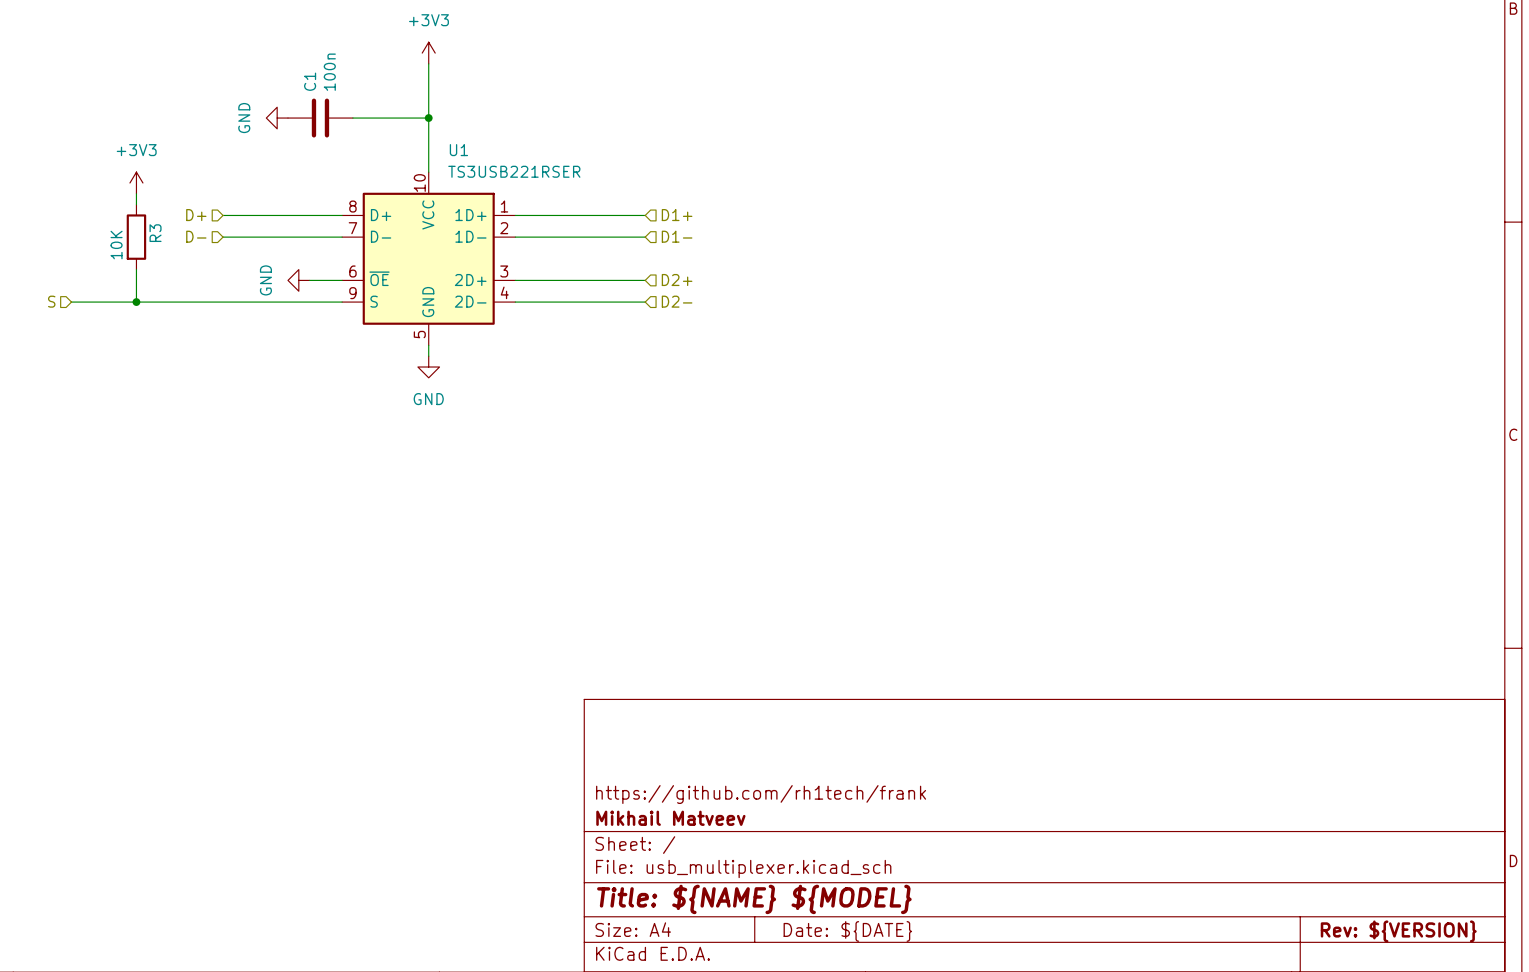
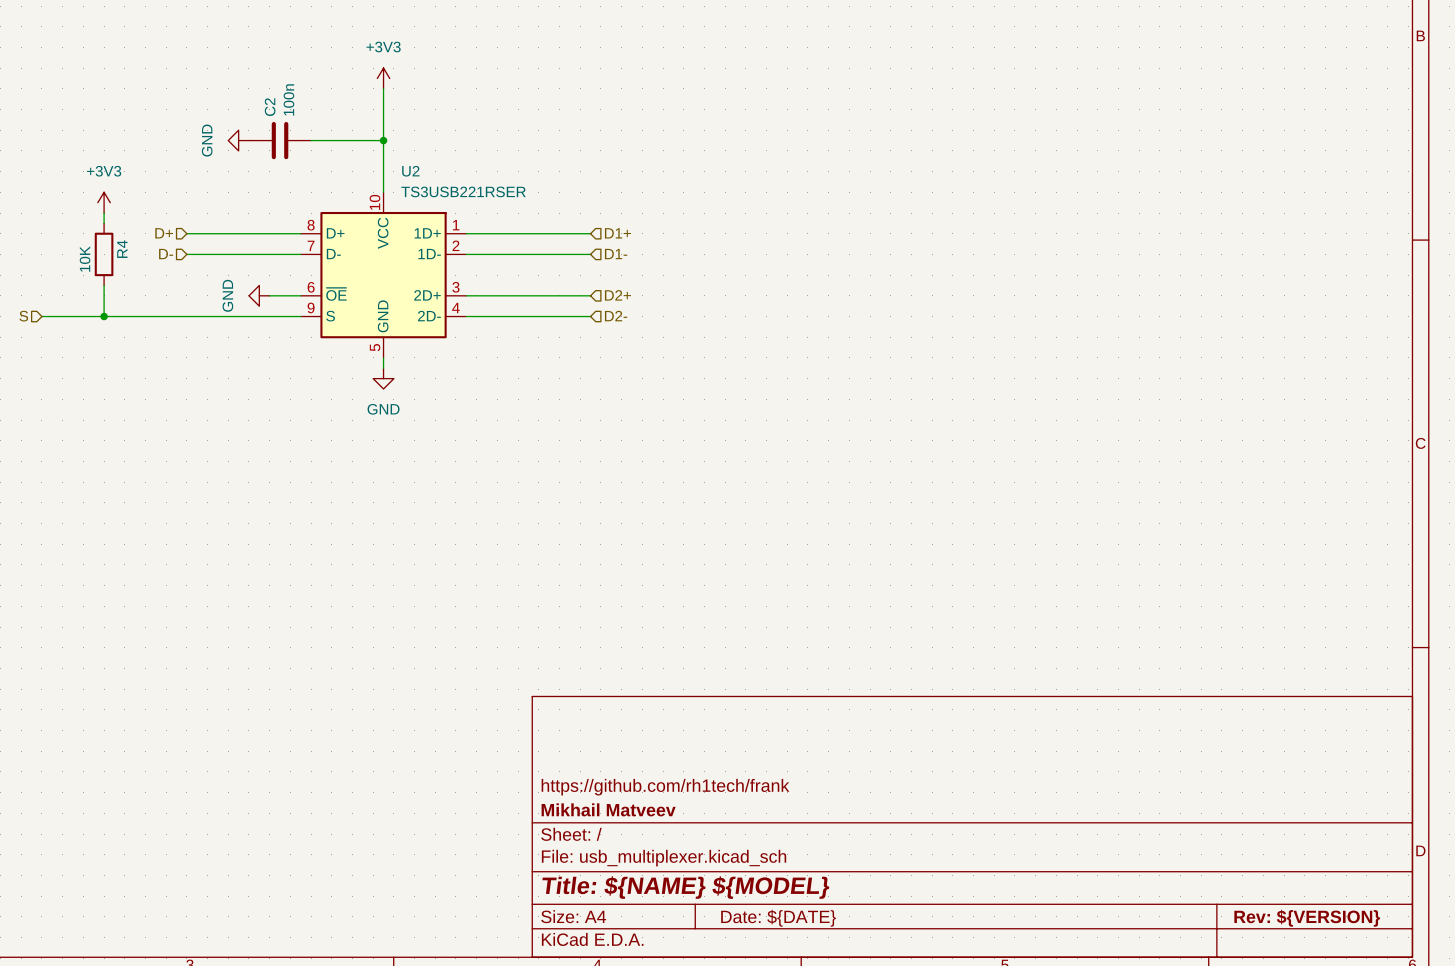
C1 name: C1 (310, 81) -> C2 (270, 107)
U1 name: U1 (458, 150) -> U2 (410, 171)
R3 name: R3 (155, 233) -> R4 (122, 249)

